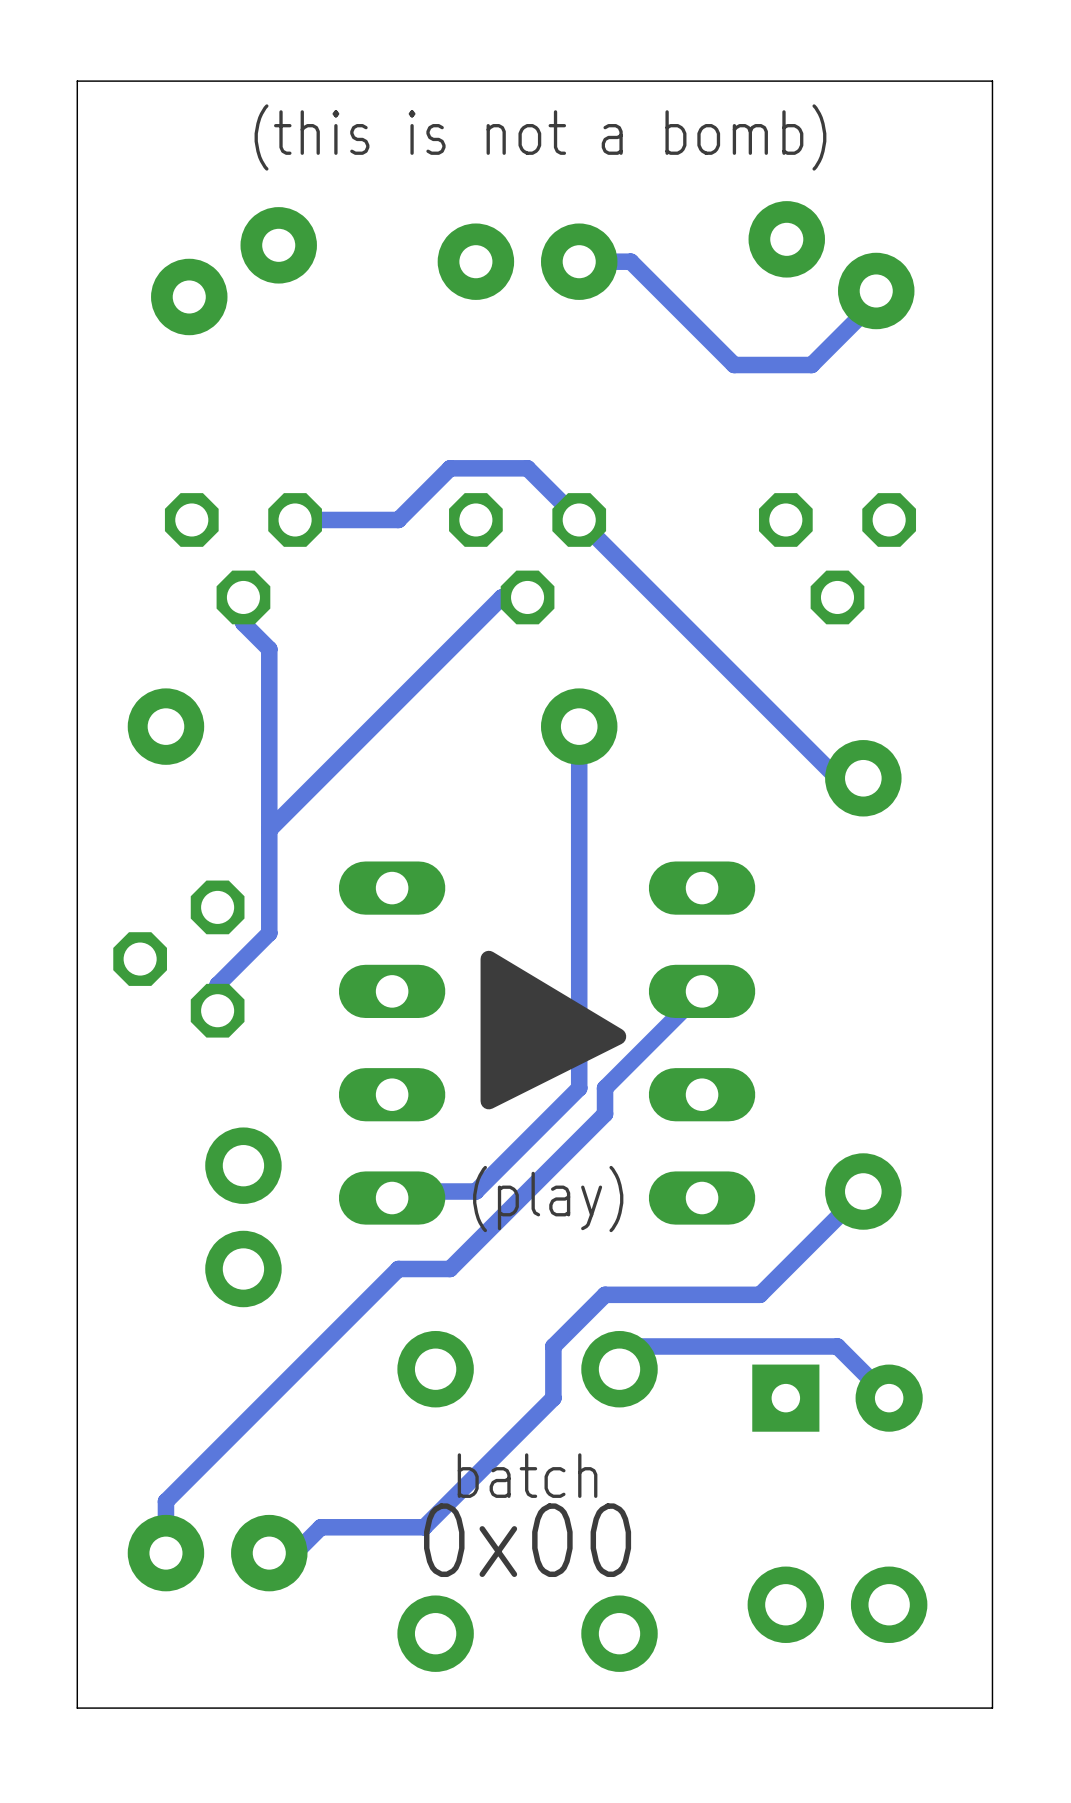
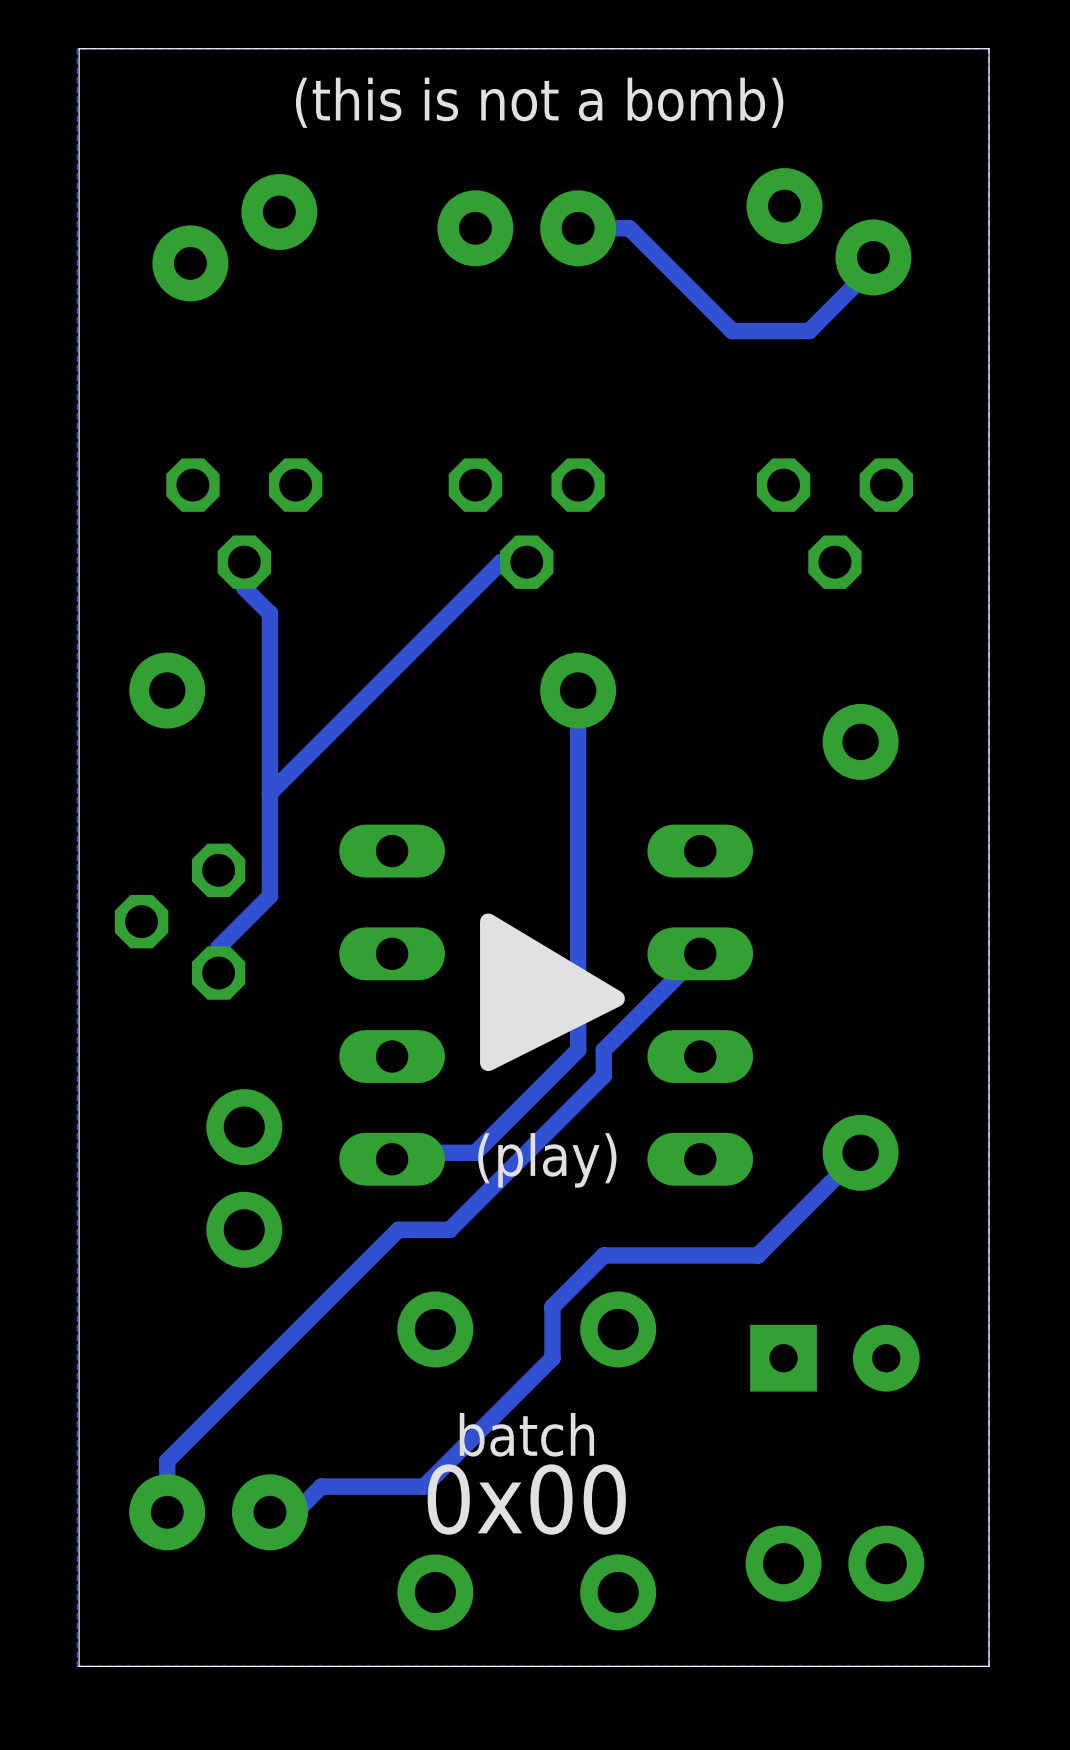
zone outline: none -> (989, 48) (77, 48) (77, 1666) (989, 1666) (989, 48)
track: (295, 519) (398, 519) (450, 468) (527, 468) (837, 778) (863, 778) -> none
track: (619, 1369) (630, 1346) (837, 1346) (889, 1398) -> none

